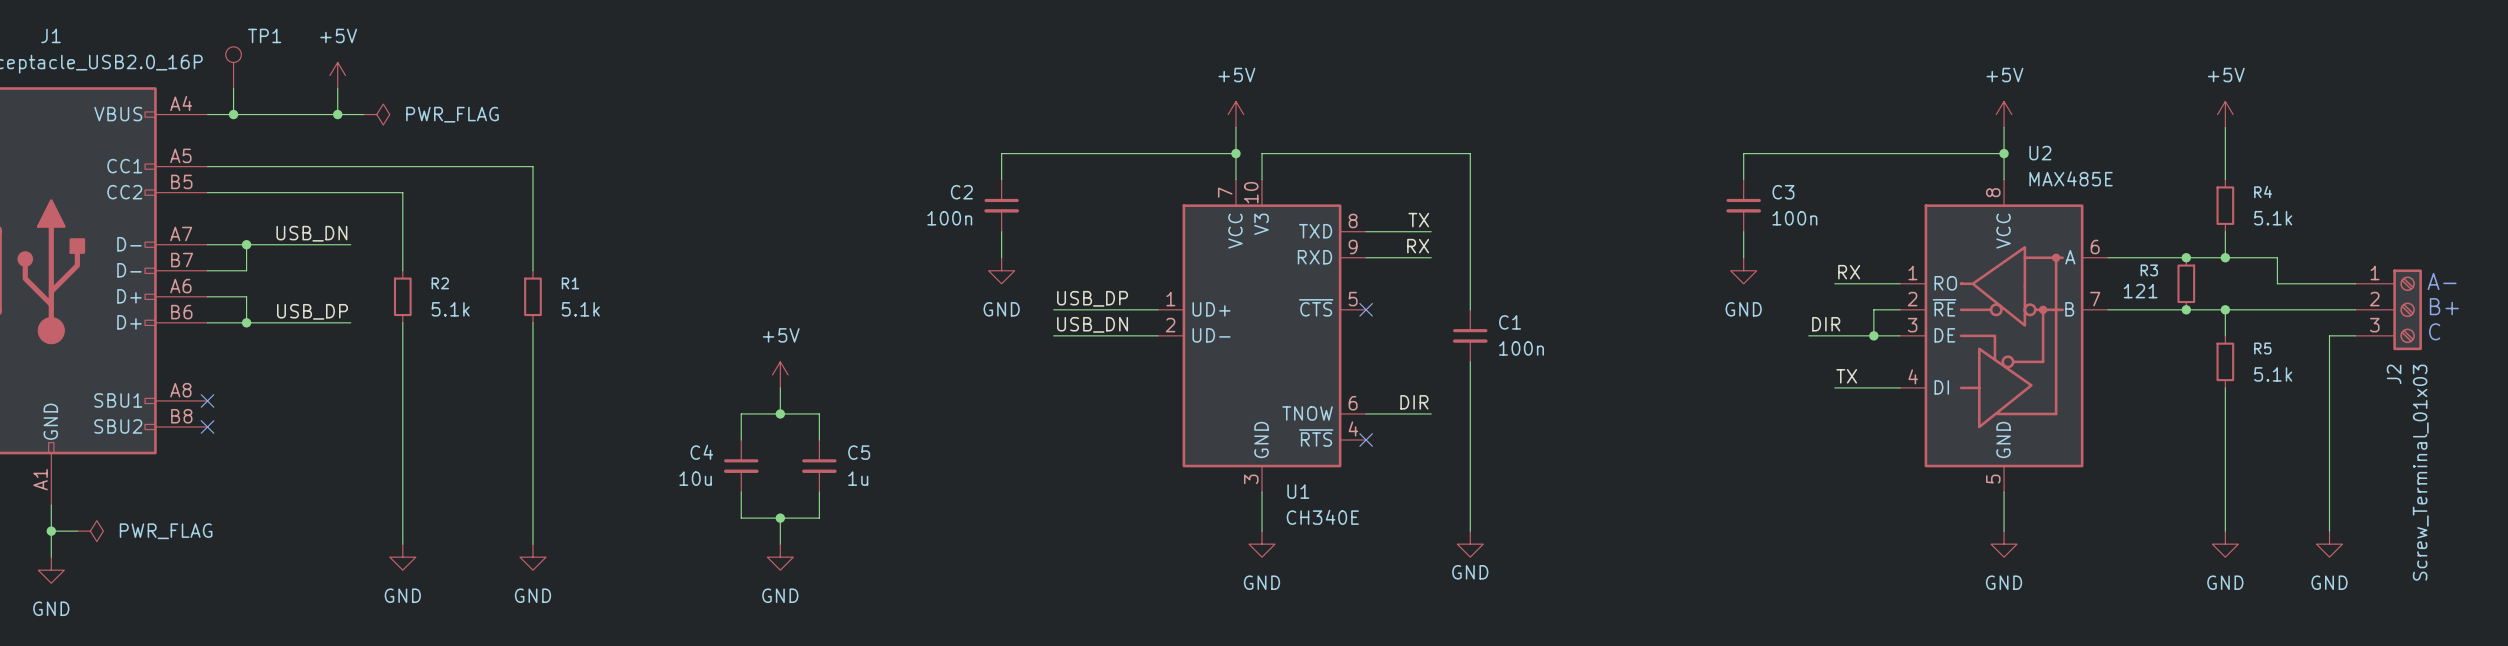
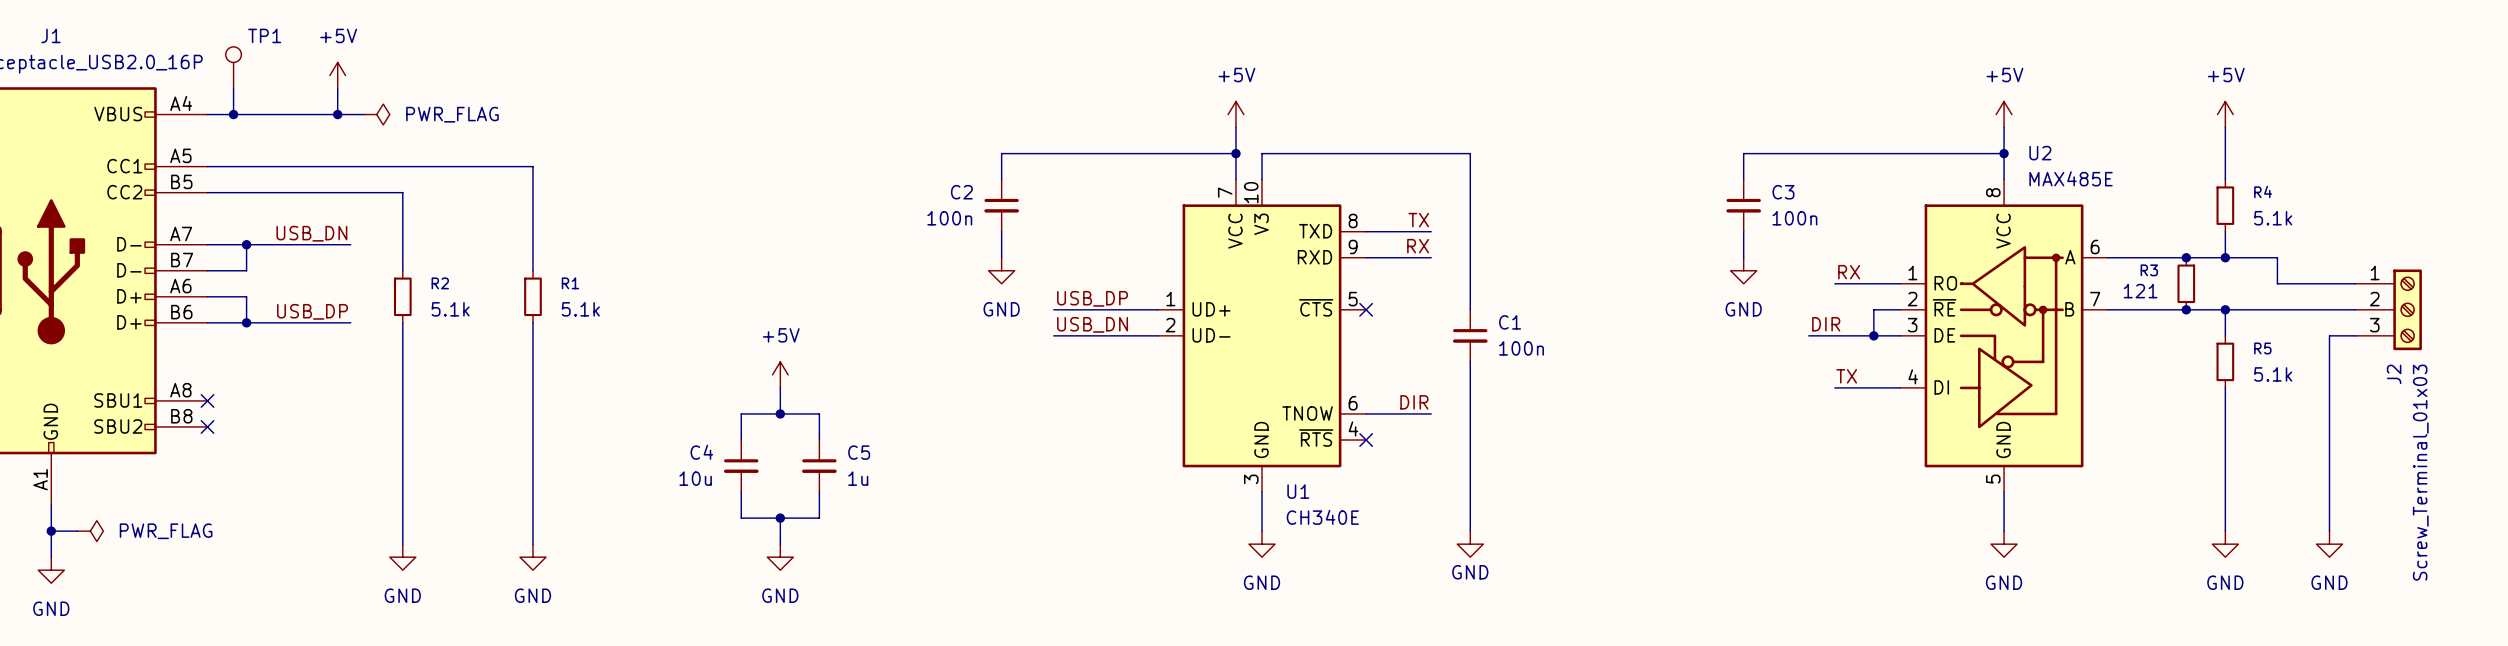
text: A- (2442, 281) -> none
text: B+ (2444, 306) -> none
text: C (2434, 331) -> none

